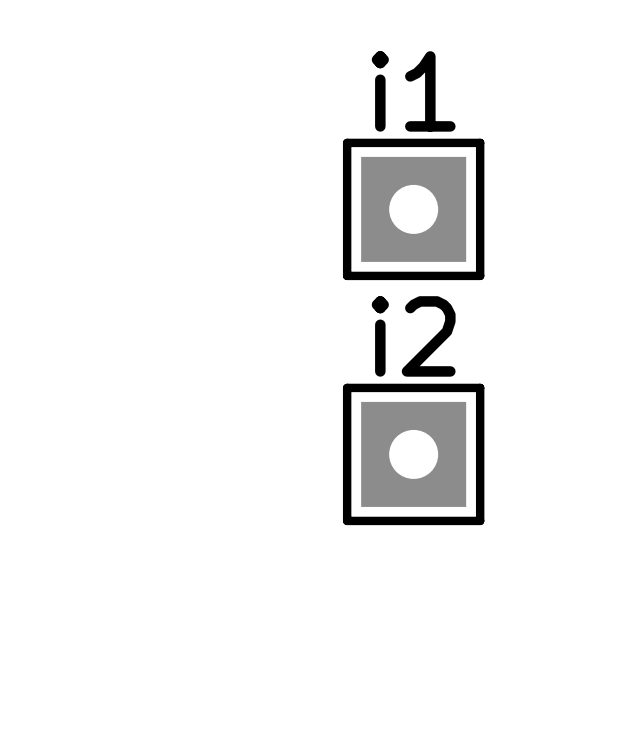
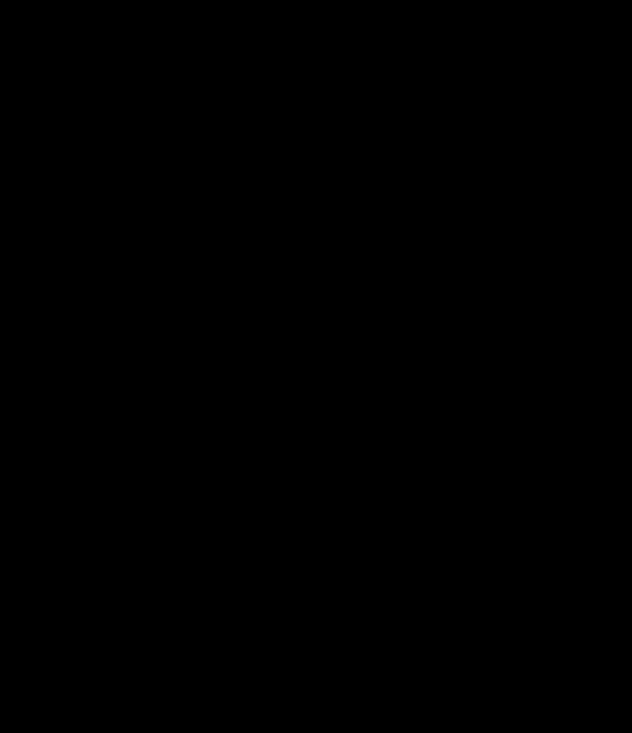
i1: (413, 209) -> none
i2: (413, 454) -> none

